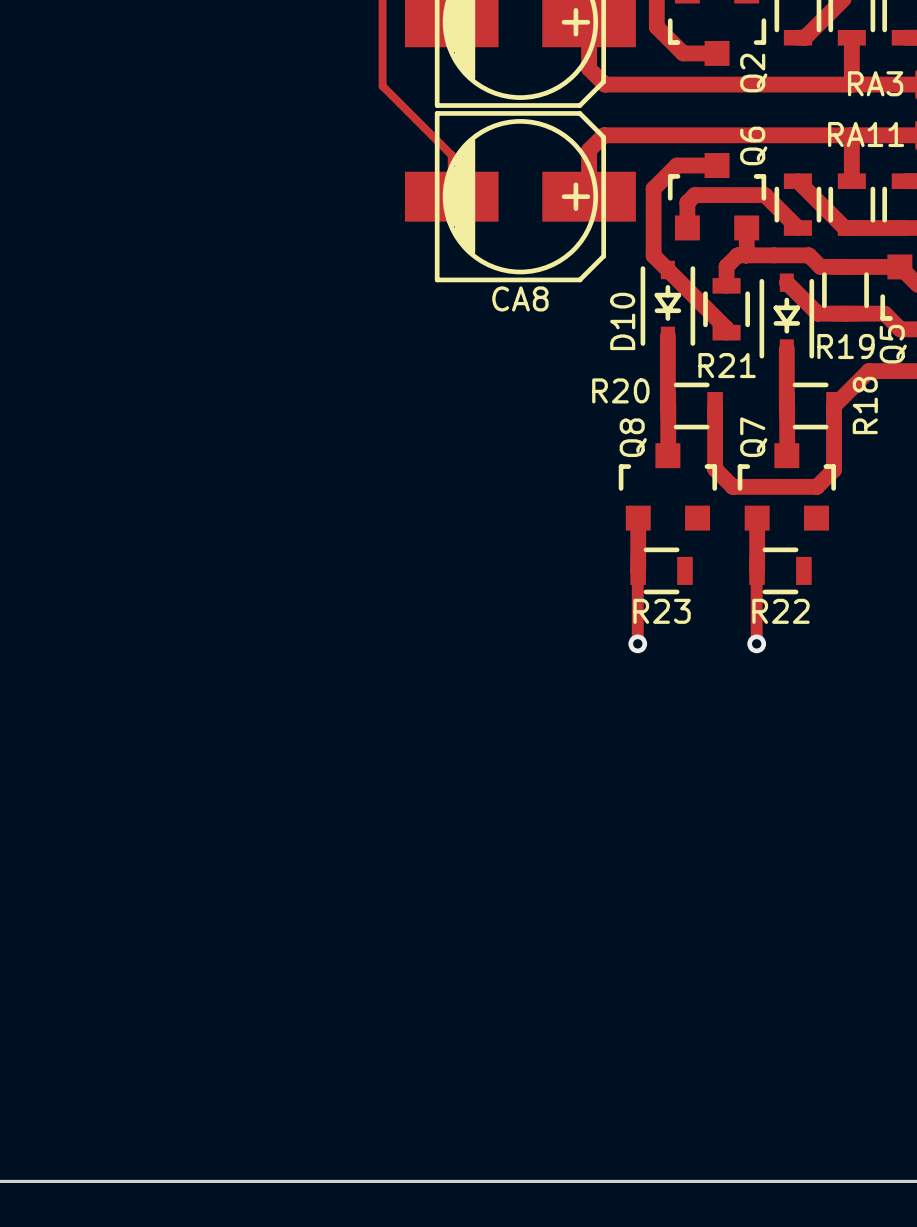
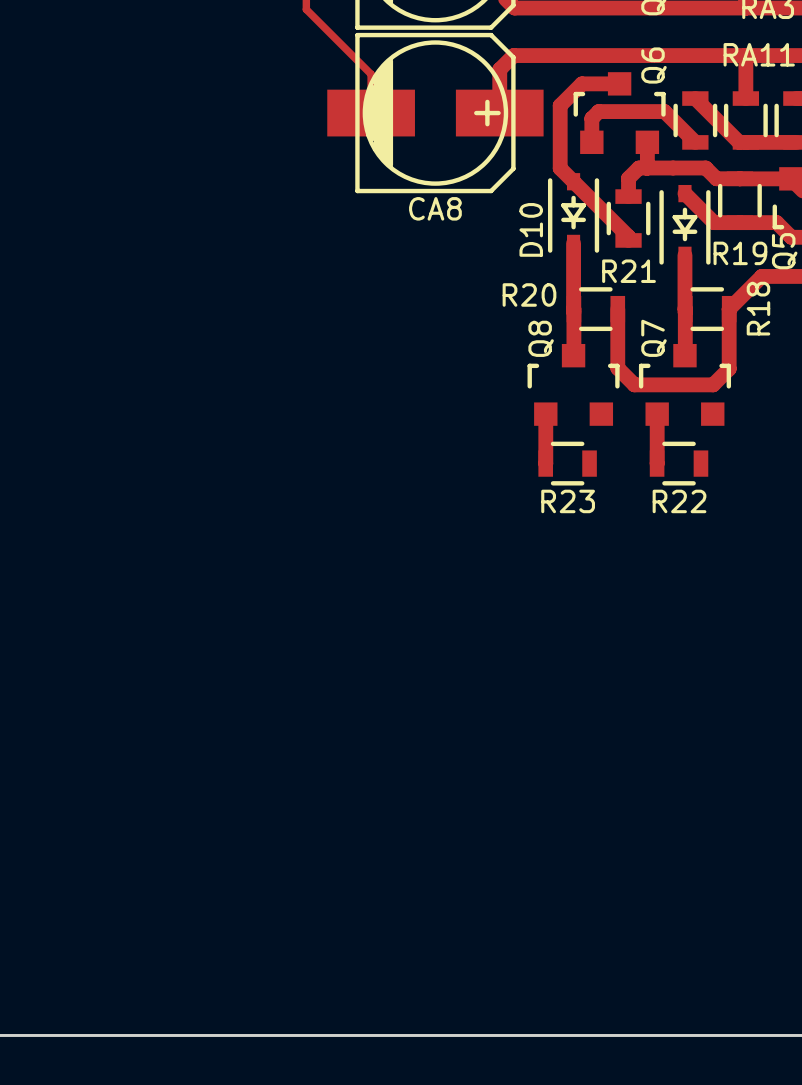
track: (637, 571) (637, 643) -> none
track: (756, 571) (756, 643) -> none
via: (637, 643) -> none
via: (756, 643) -> none

